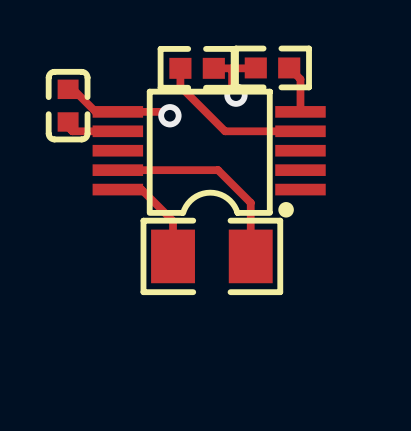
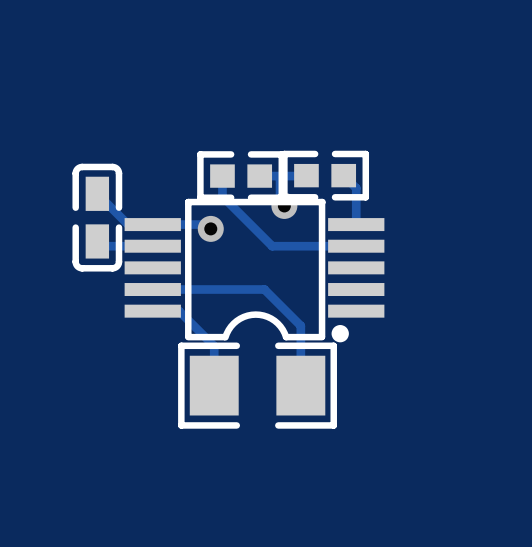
part footprint: [45, 68, 91, 143] -> [72, 163, 123, 272]

